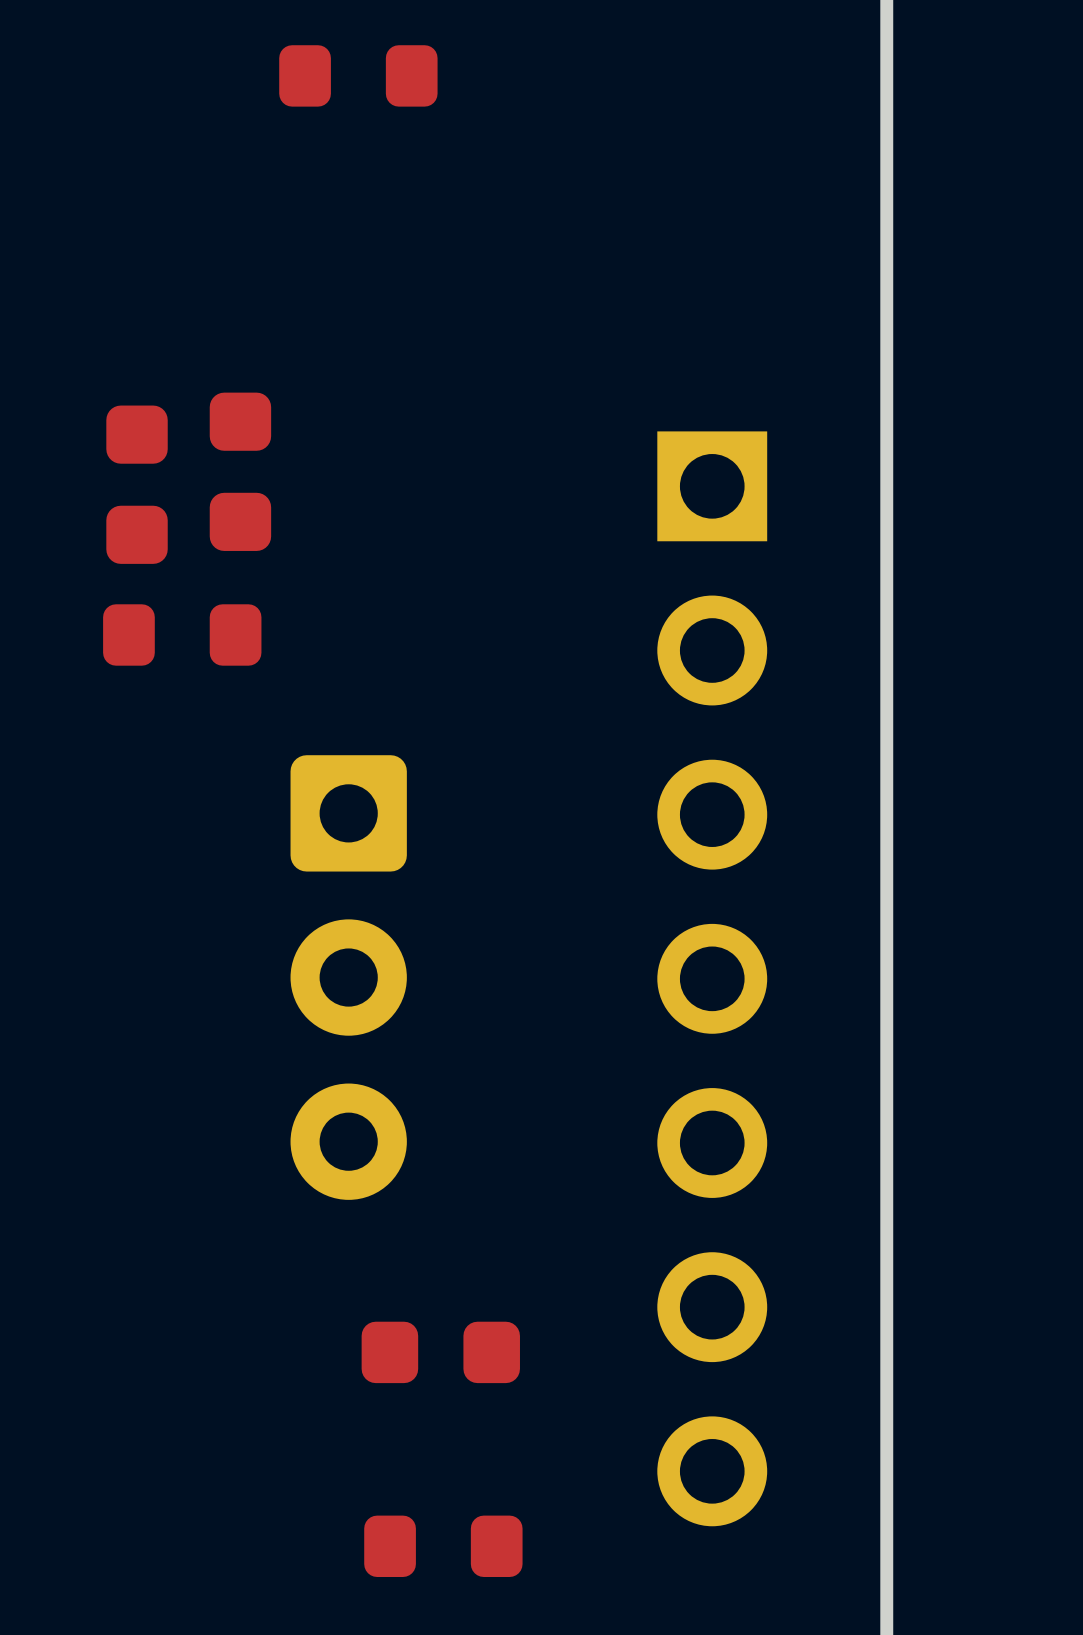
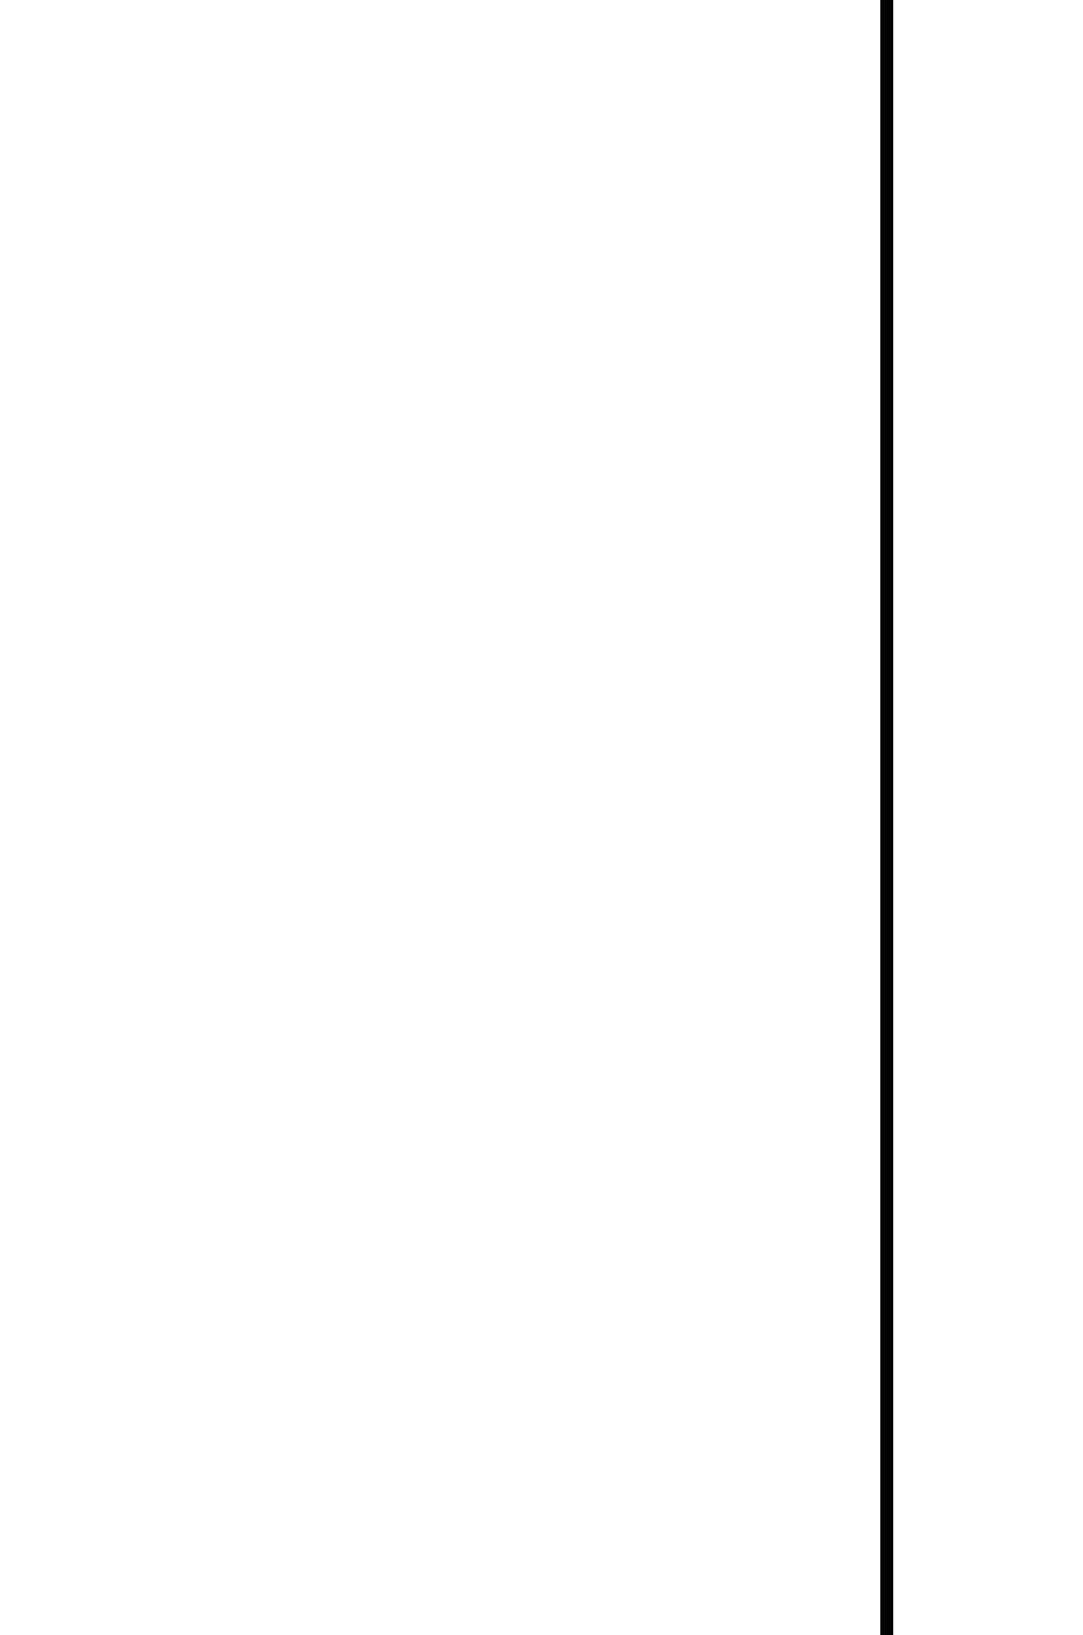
part: (358, 75) -> none
part: (240, 471) -> none
part: (137, 484) -> none
part: (182, 634) -> none
part: (348, 977) -> none
part: (712, 978) -> none
part: (440, 1352) -> none
part: (443, 1546) -> none

